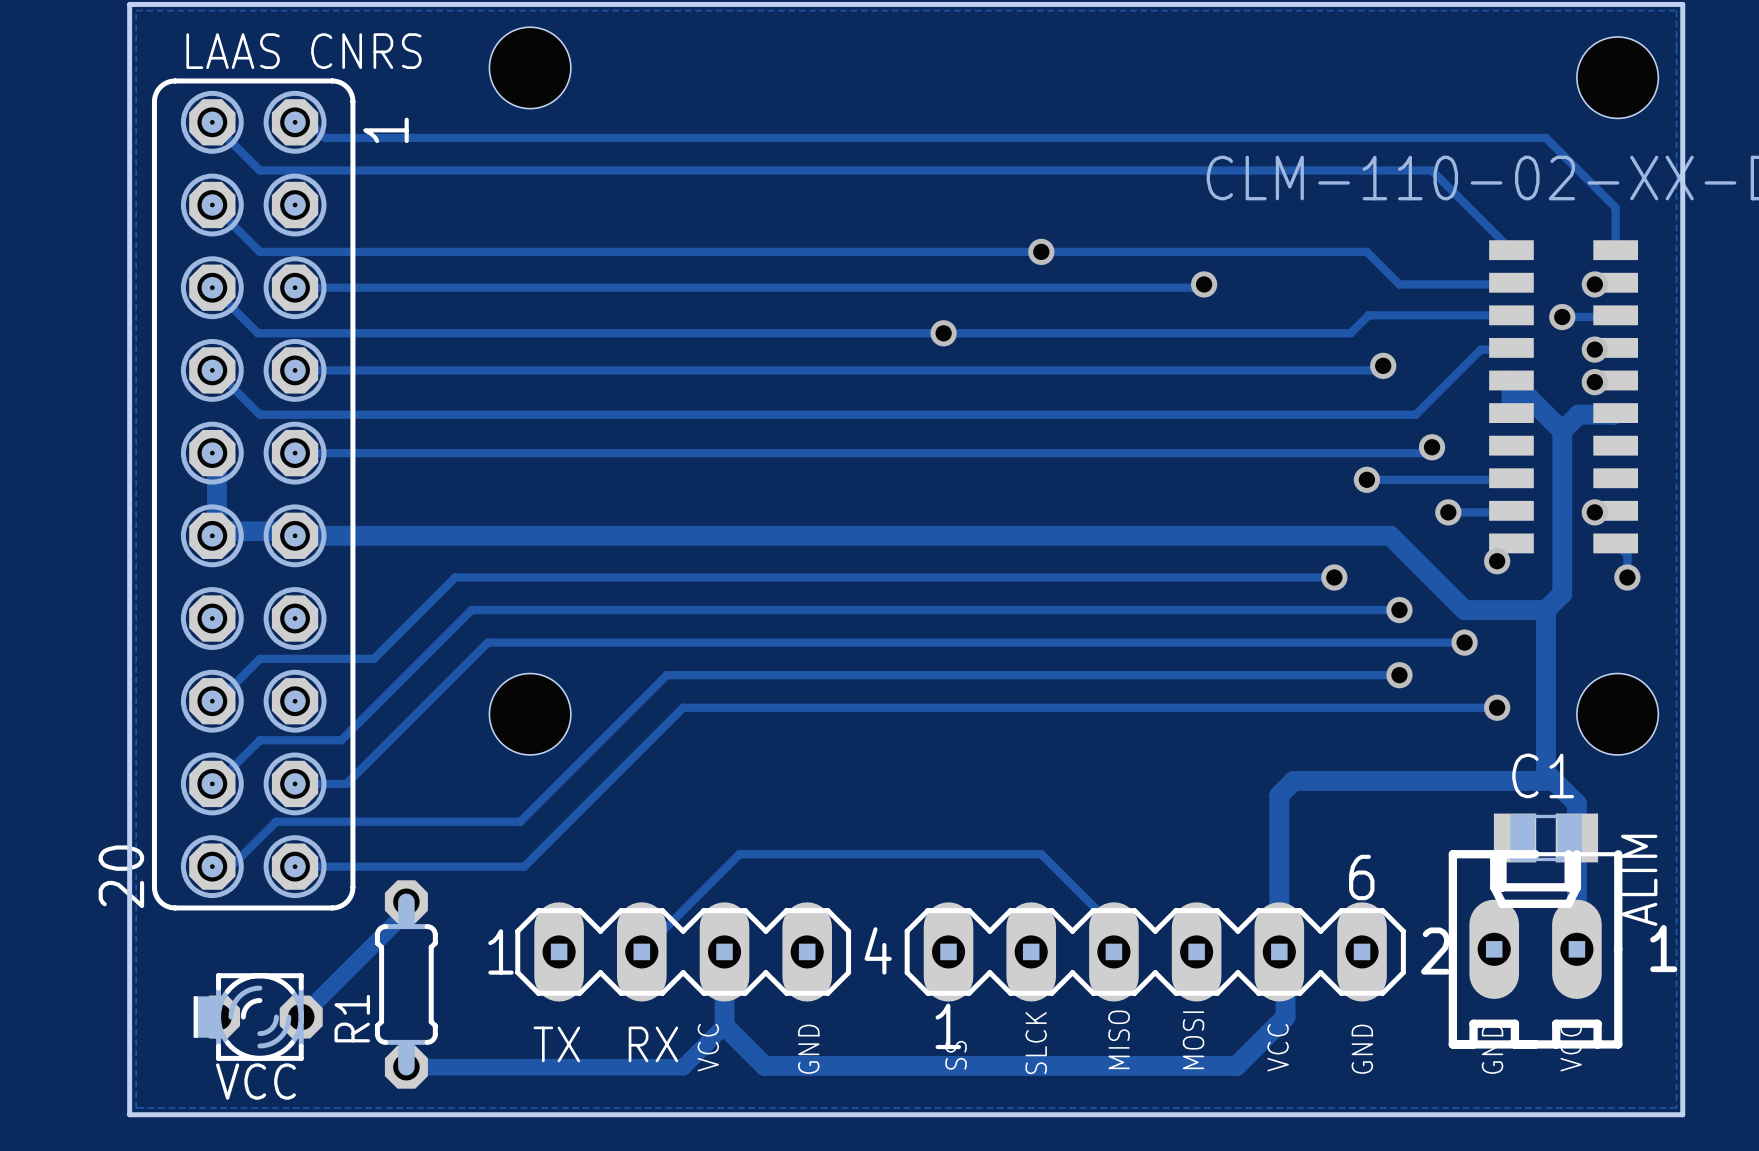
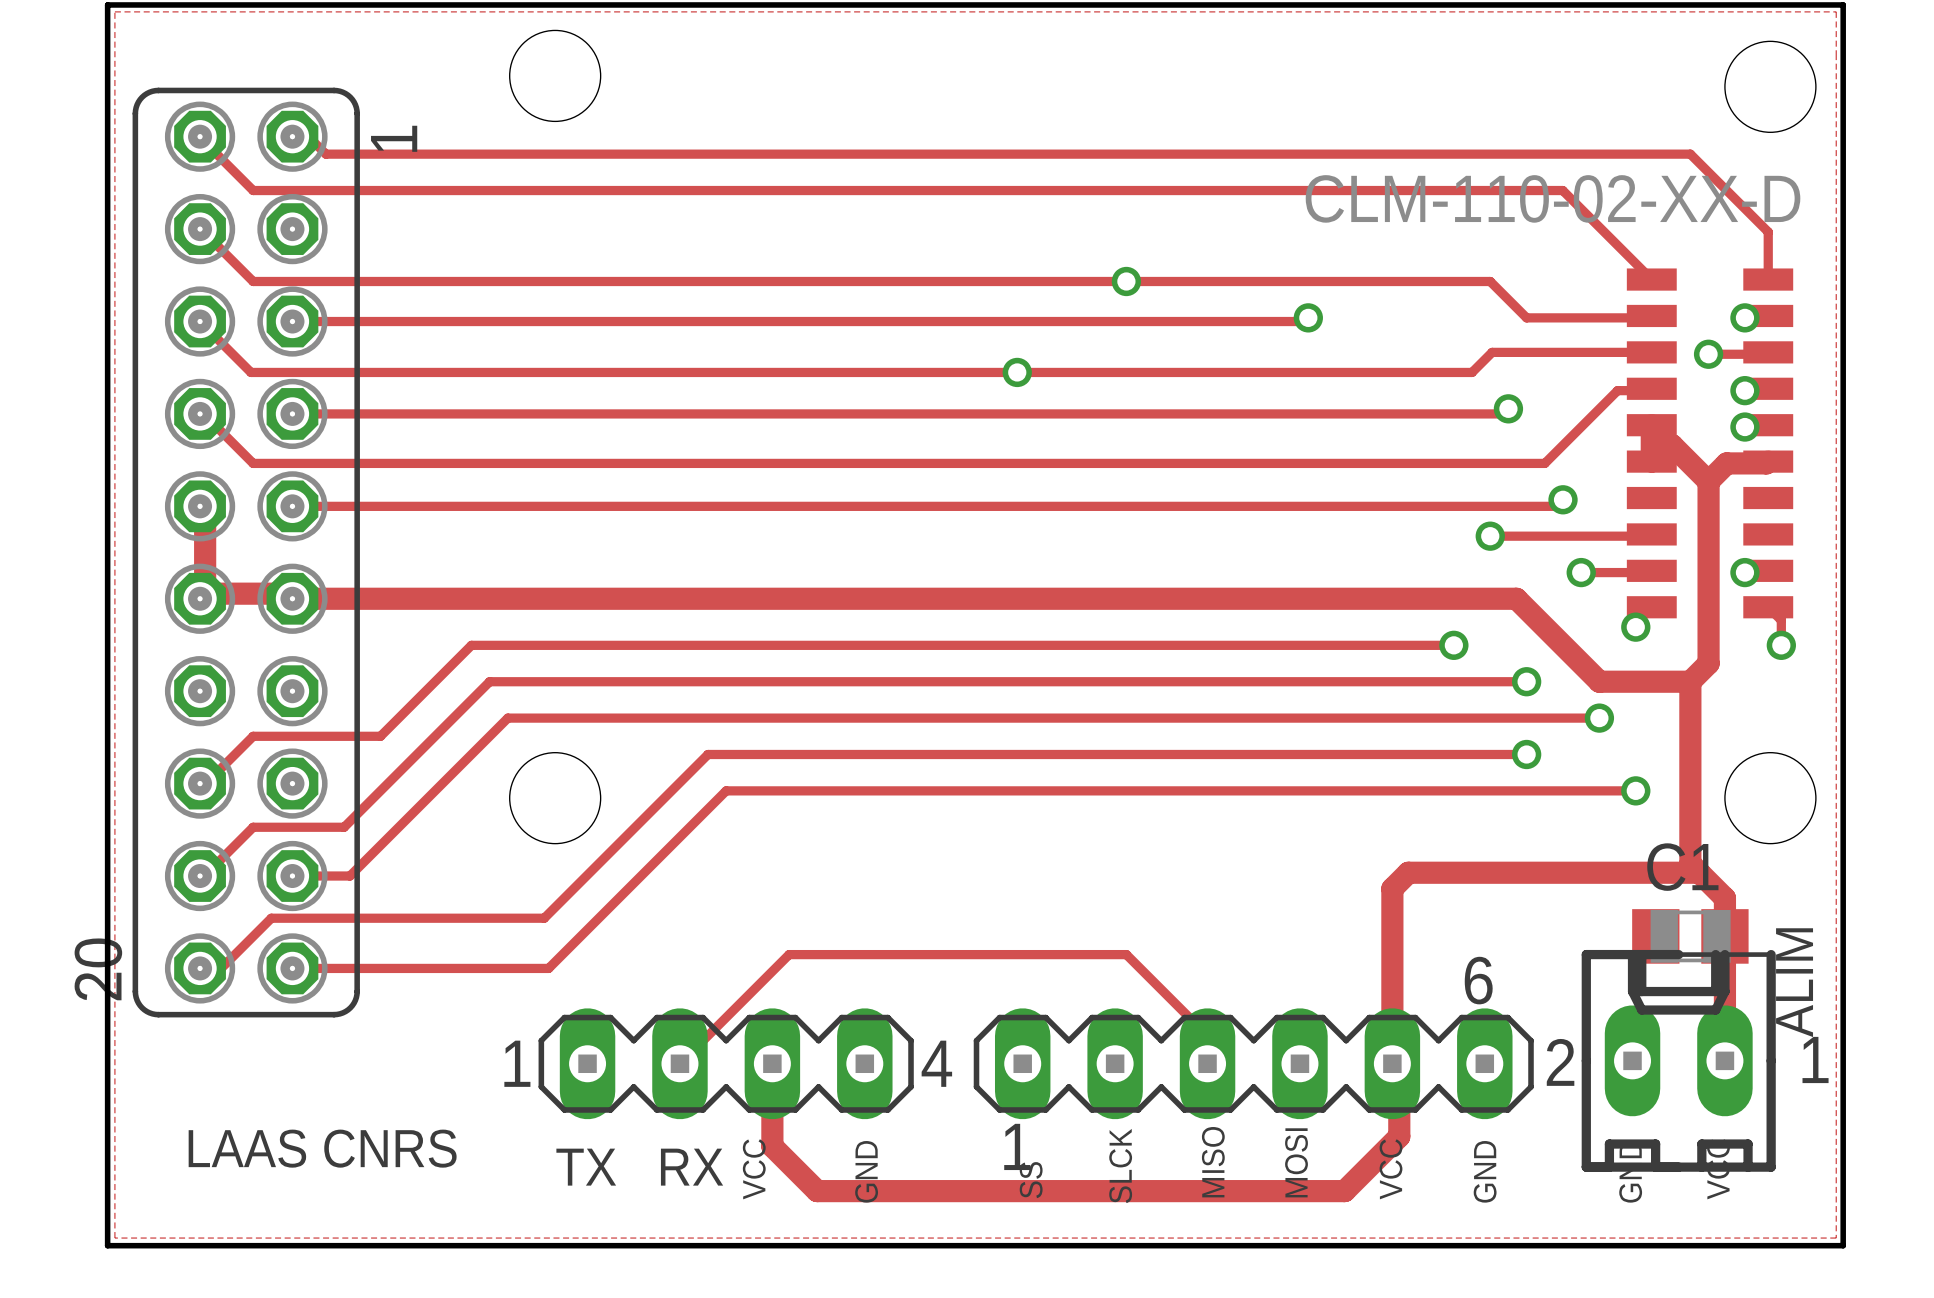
text: LAAS CNRS (303, 51) -> none
track: (406, 901) (406, 911) (301, 1017) -> none
R1: (406, 984) -> none
VCC: (258, 1017) -> none
track: (724, 1025) (683, 1067) (406, 1067) -> none
text: none -> LAAS CNRS (322, 1148)

